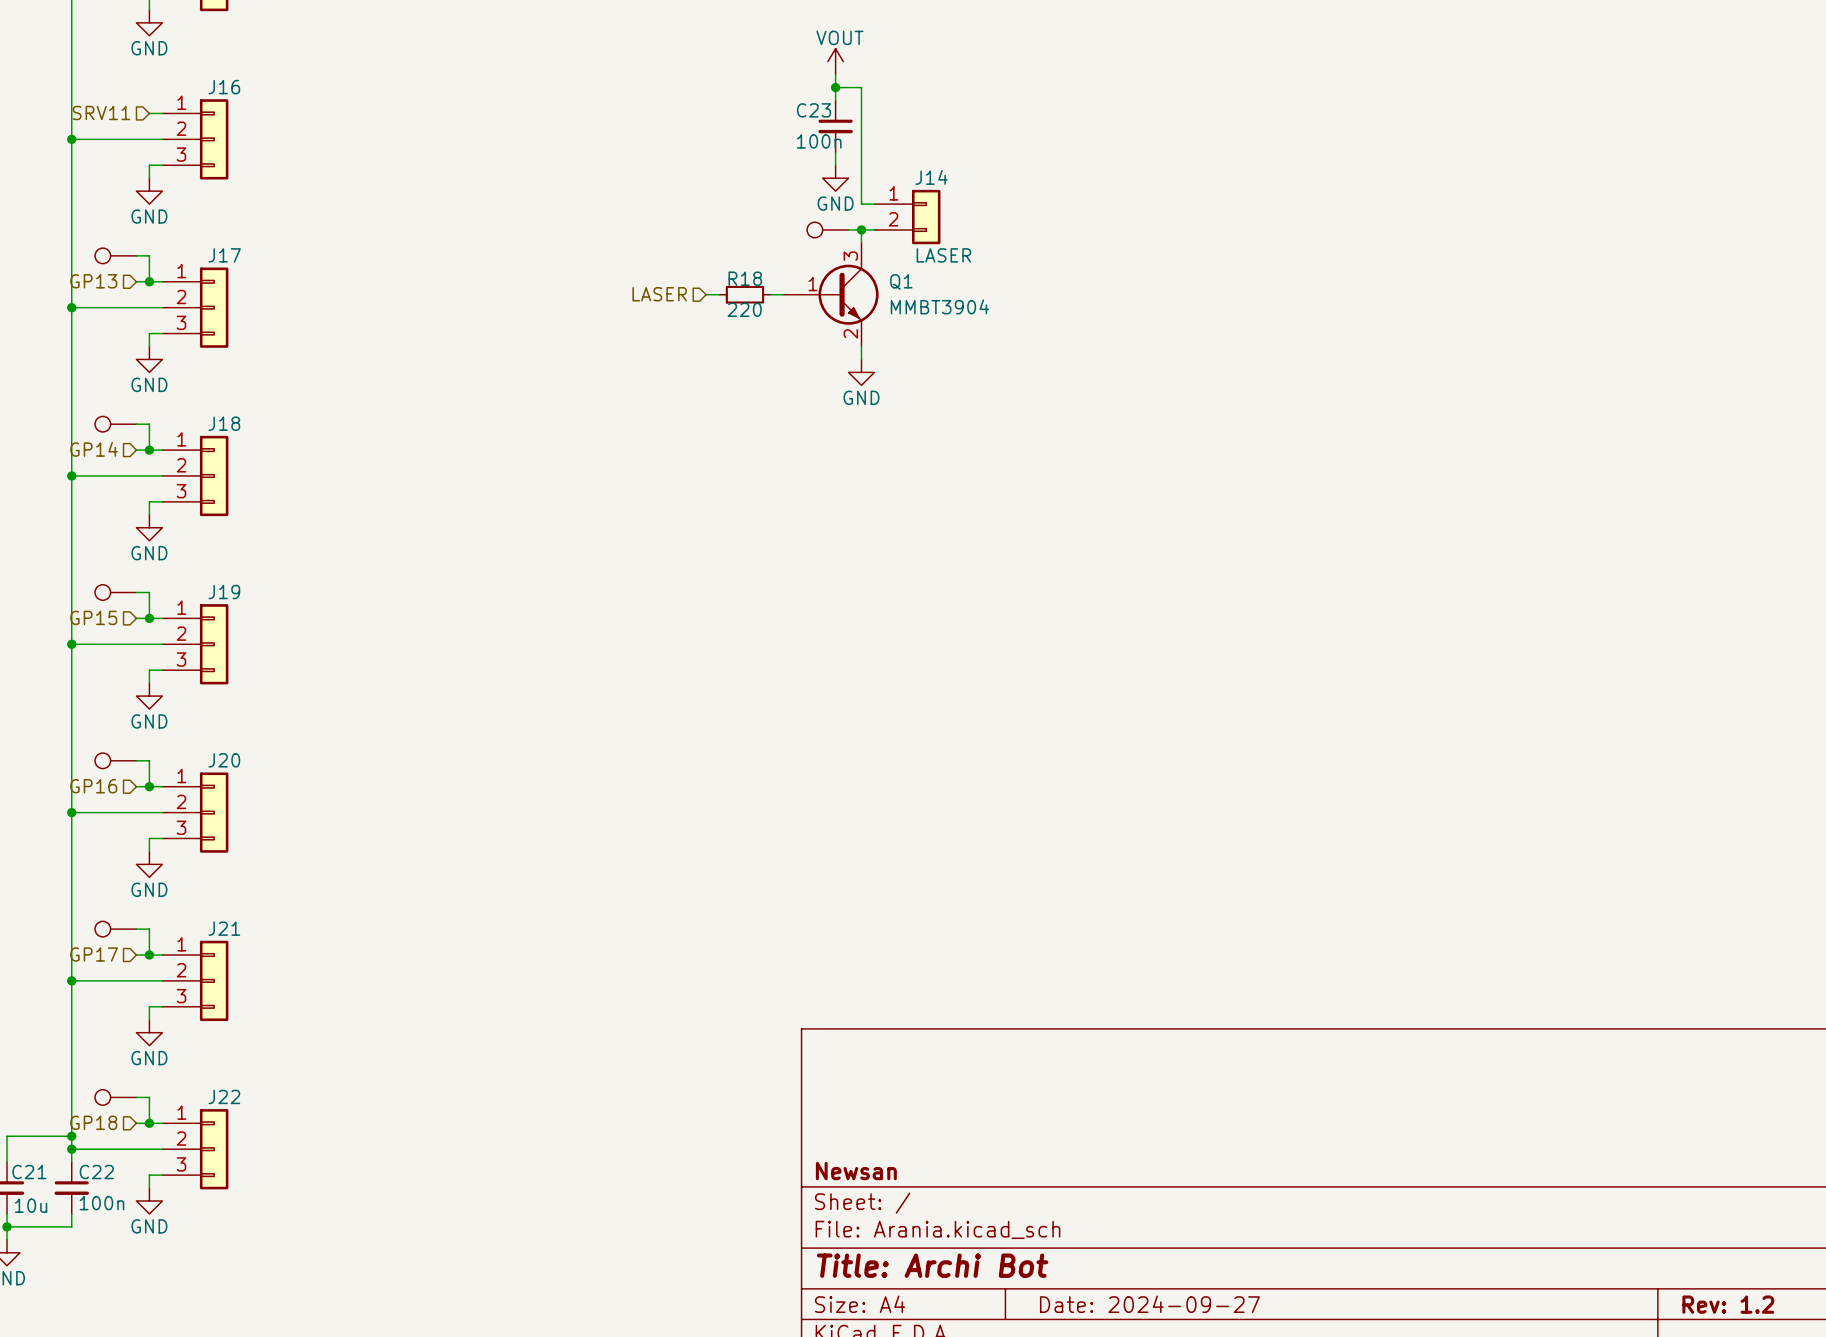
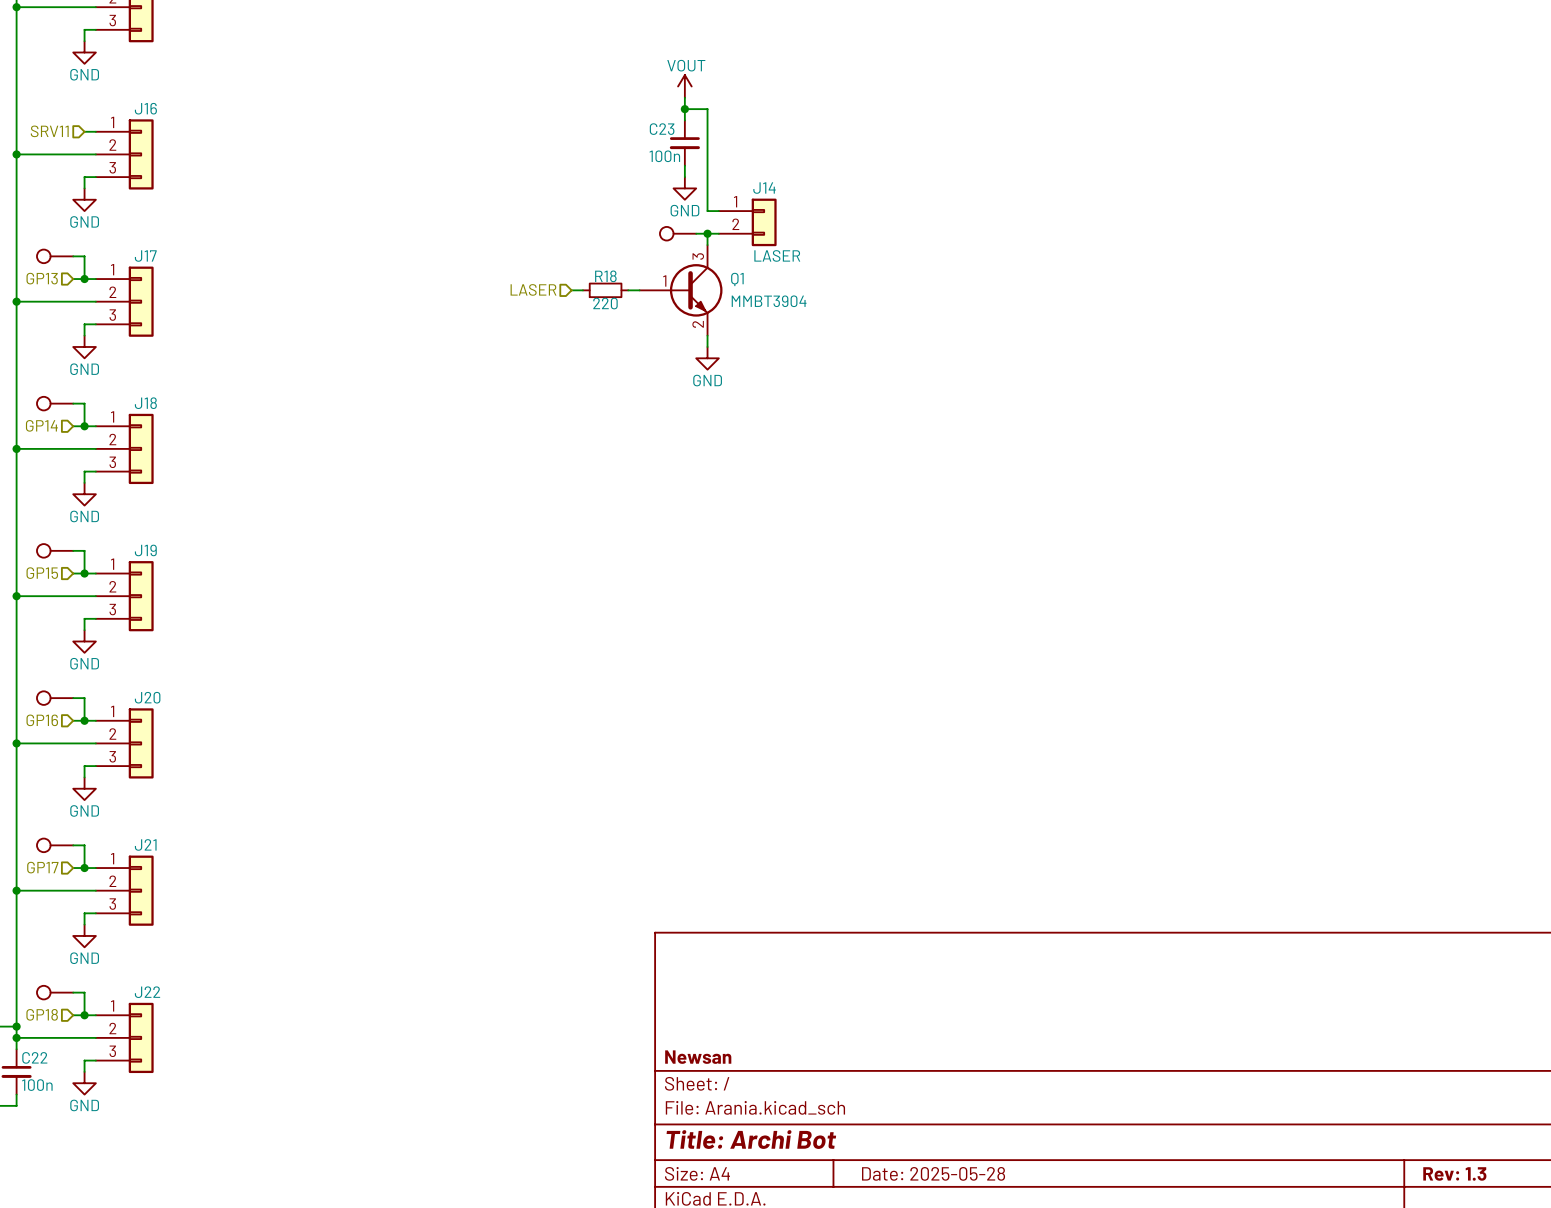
title block: Date: 2024-09-27 (1149, 1304) -> Date: 2025-05-28 (933, 1173)
title block: Rev: 1.2 (1728, 1304) -> Rev: 1.3 (1454, 1173)

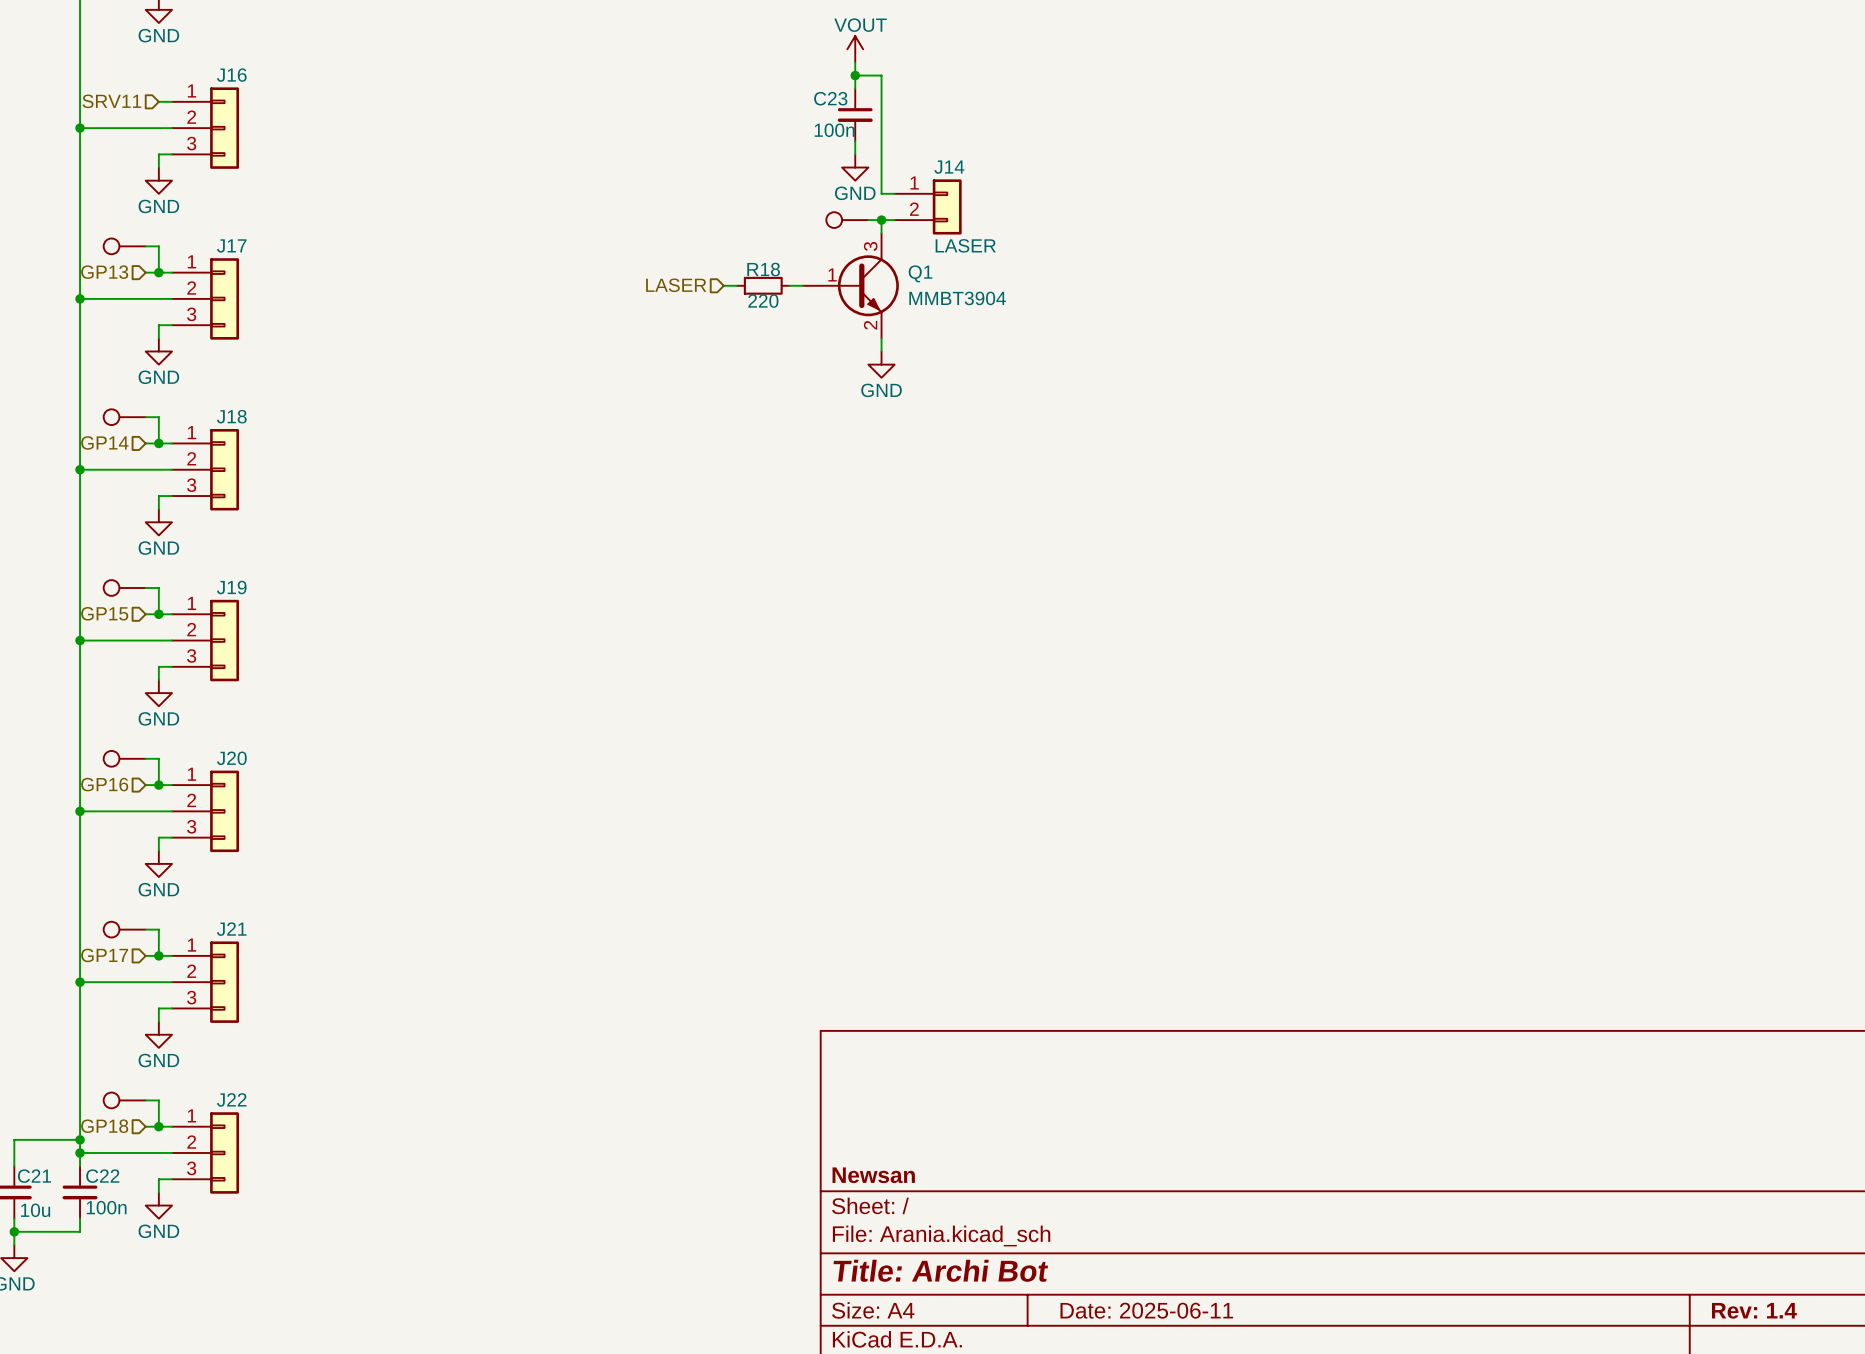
title block: Date: 2025-05-28 (933, 1173) -> Date: 2025-06-11 (1146, 1310)
title block: Rev: 1.3 (1454, 1173) -> Rev: 1.4 (1754, 1310)

